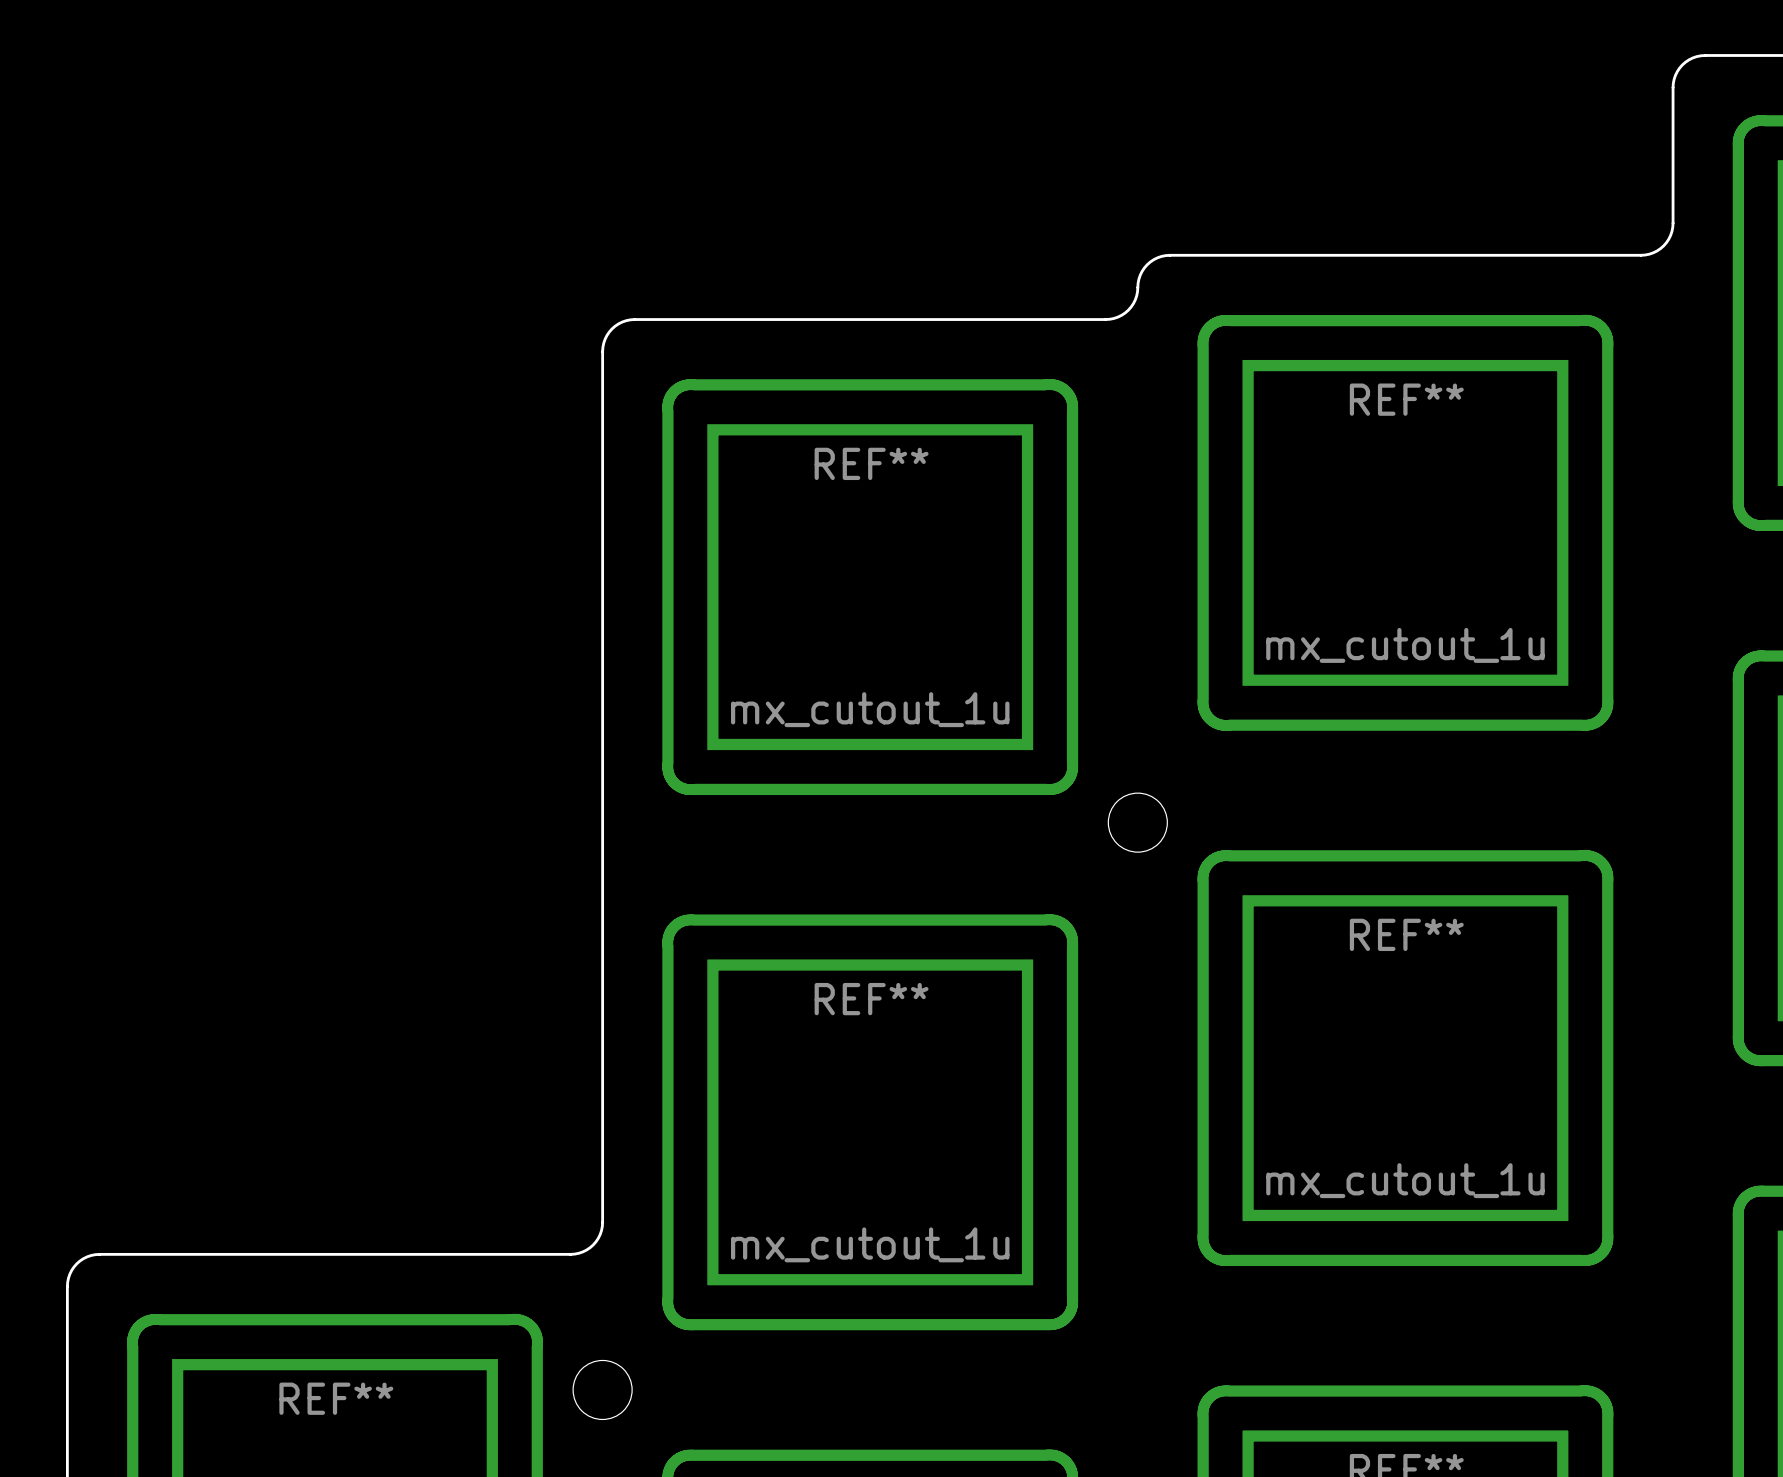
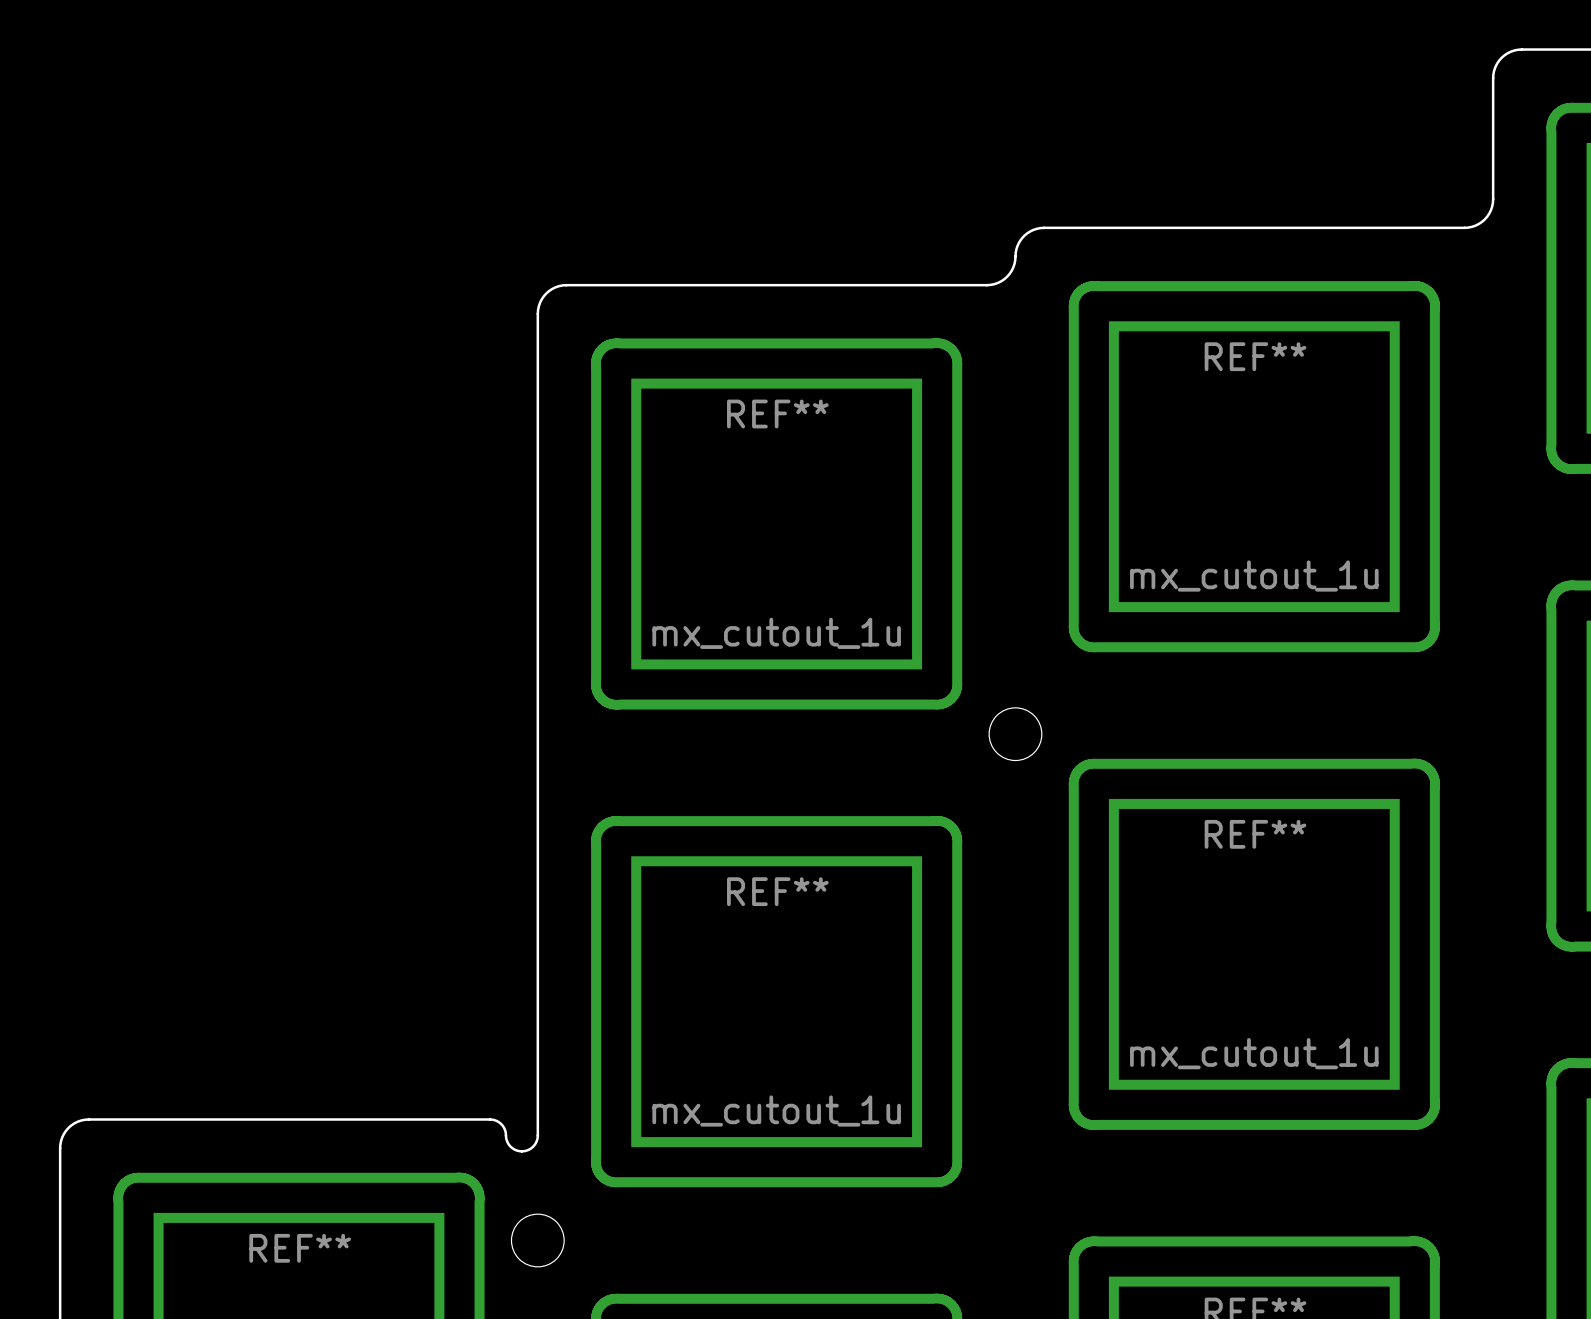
board edge: (602, 1222) (598, 1238) (586, 1250) (574, 1254) (549, 1254) -> (537, 1090) (537, 1137) (535, 1143) (529, 1149) (519, 1151) (512, 1148) (507, 1141) (502, 1125) (498, 1121) (490, 1119)

